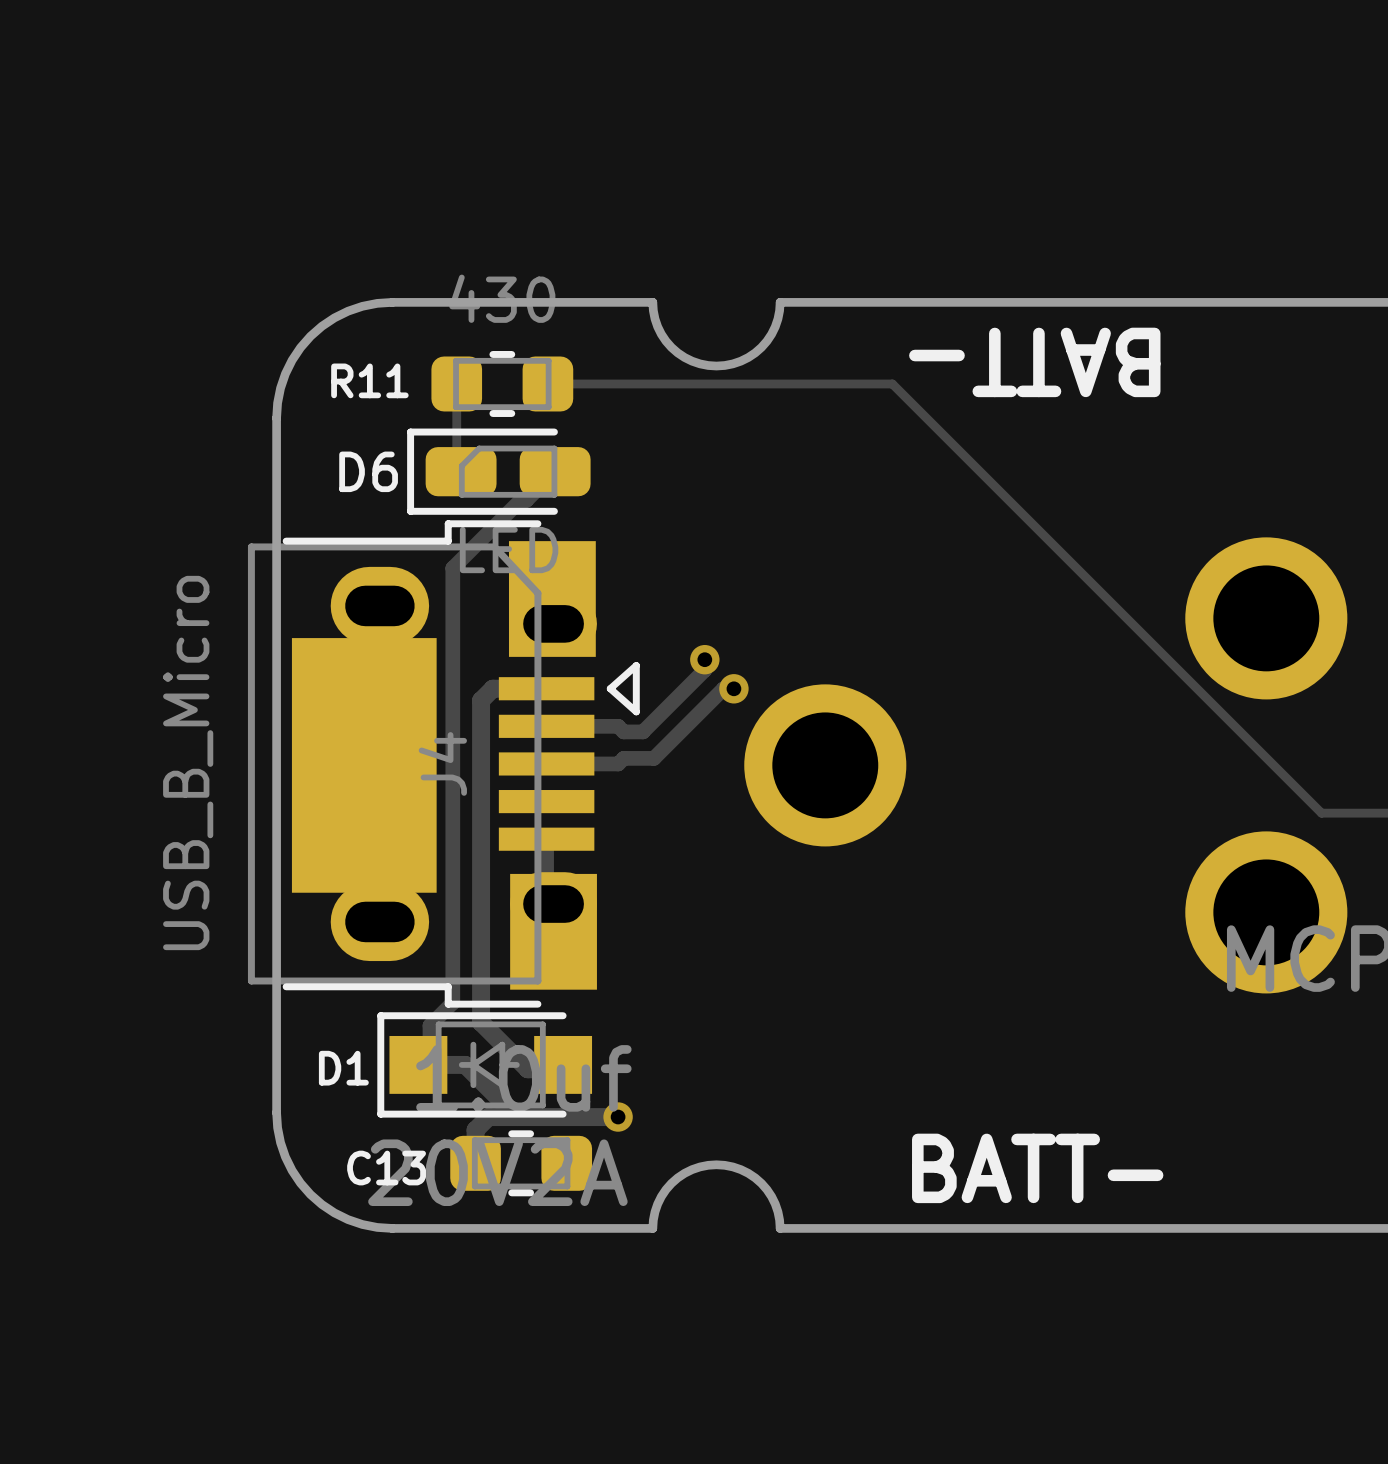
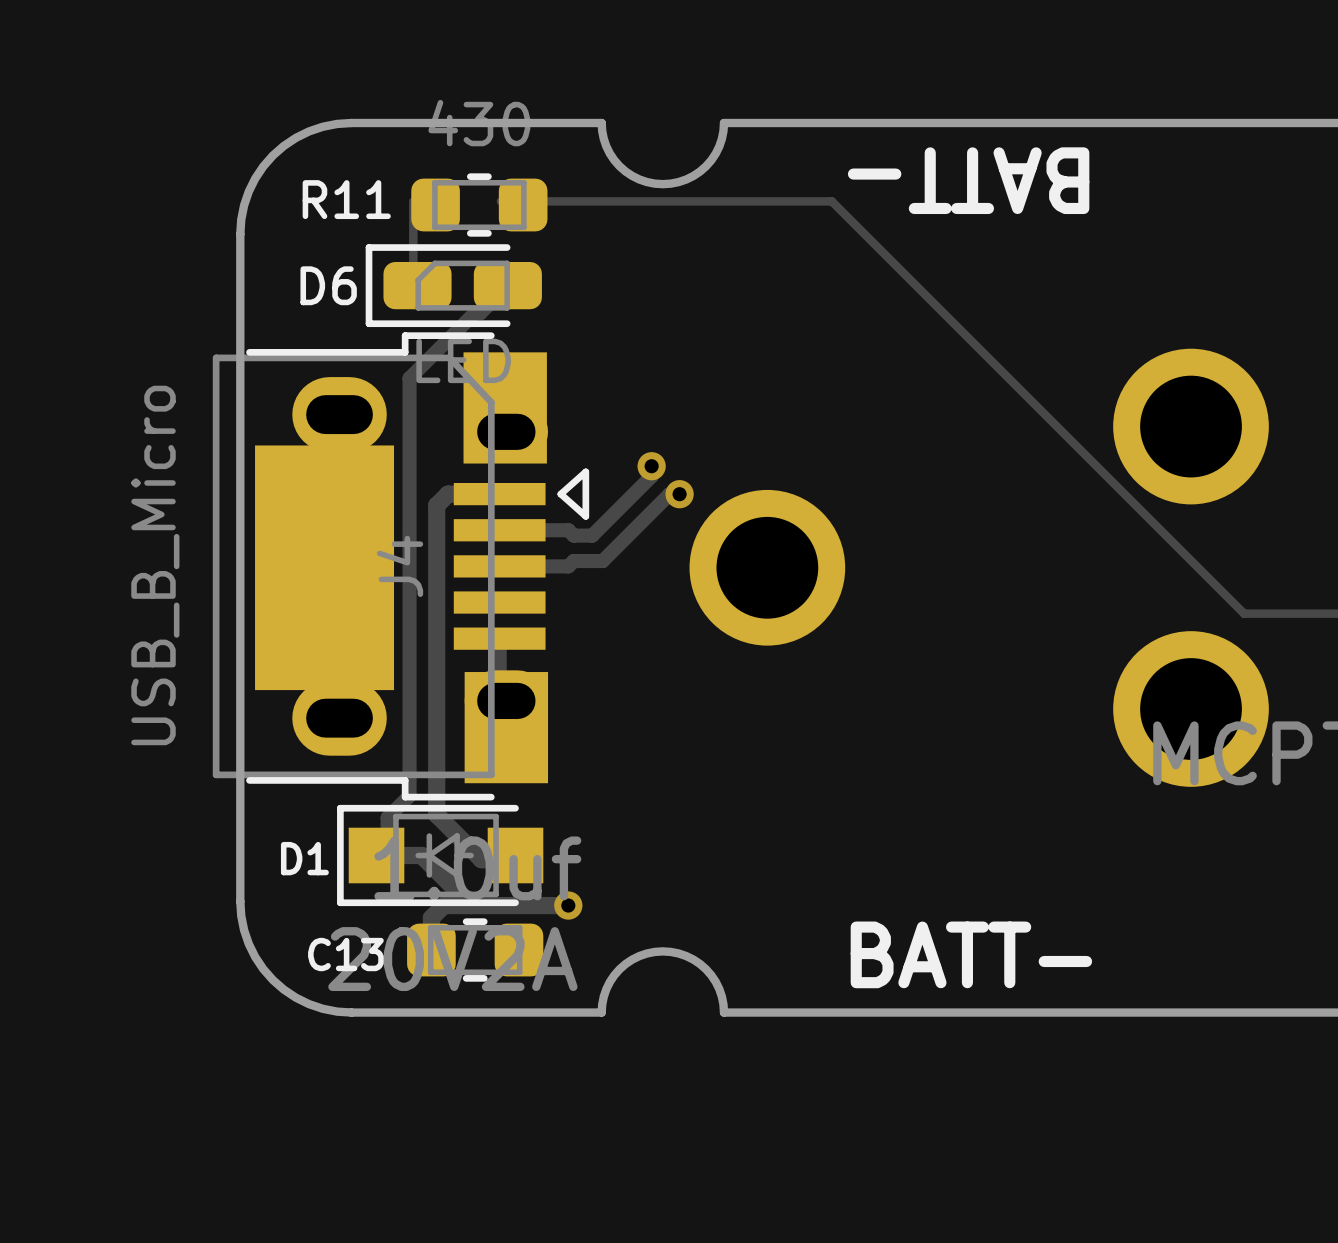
R11 name position: R11 (369, 380) -> R11 (346, 199)
R11 position: (502, 383) -> (479, 205)

